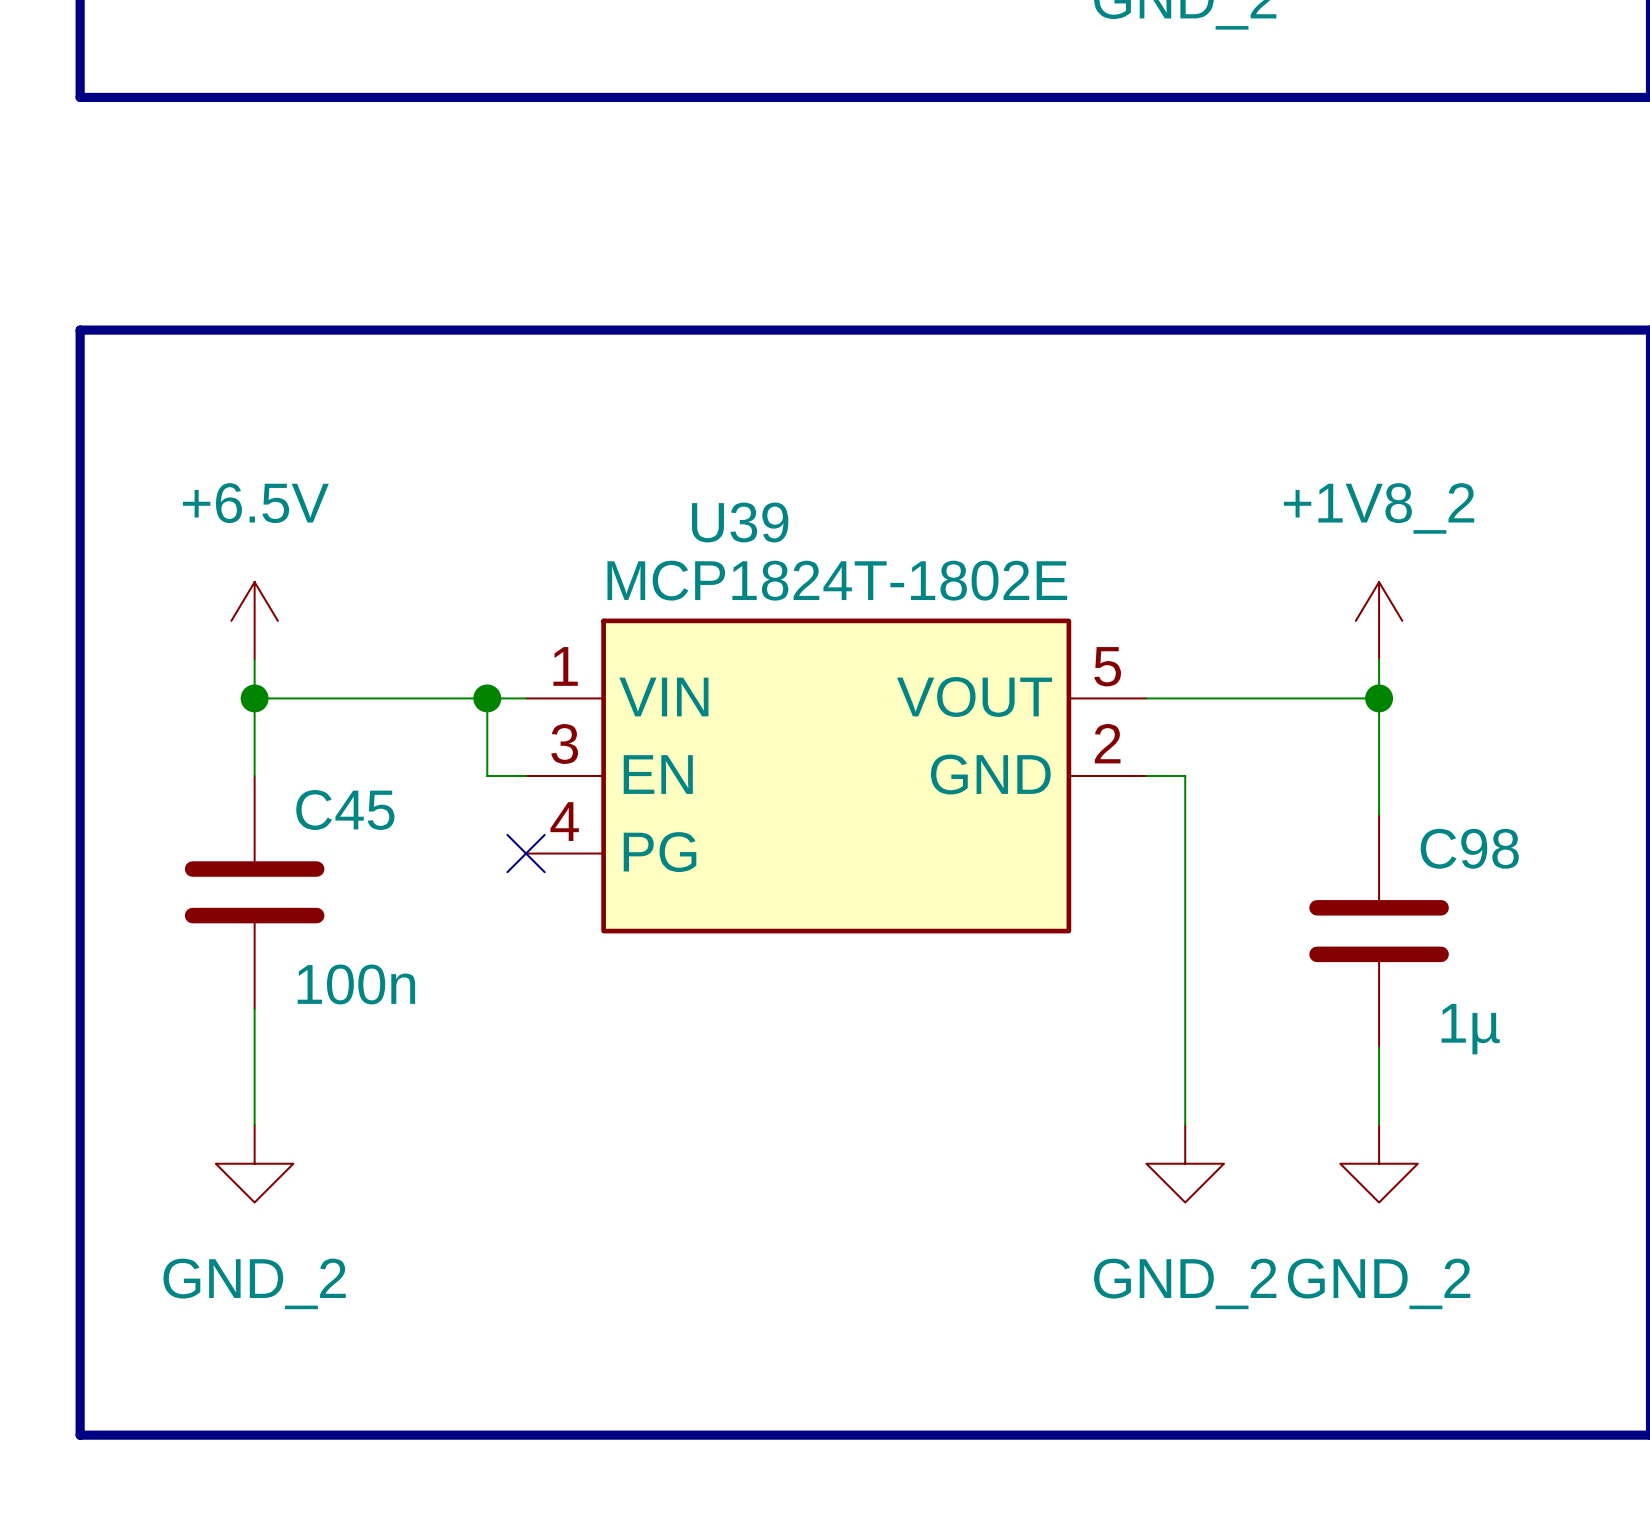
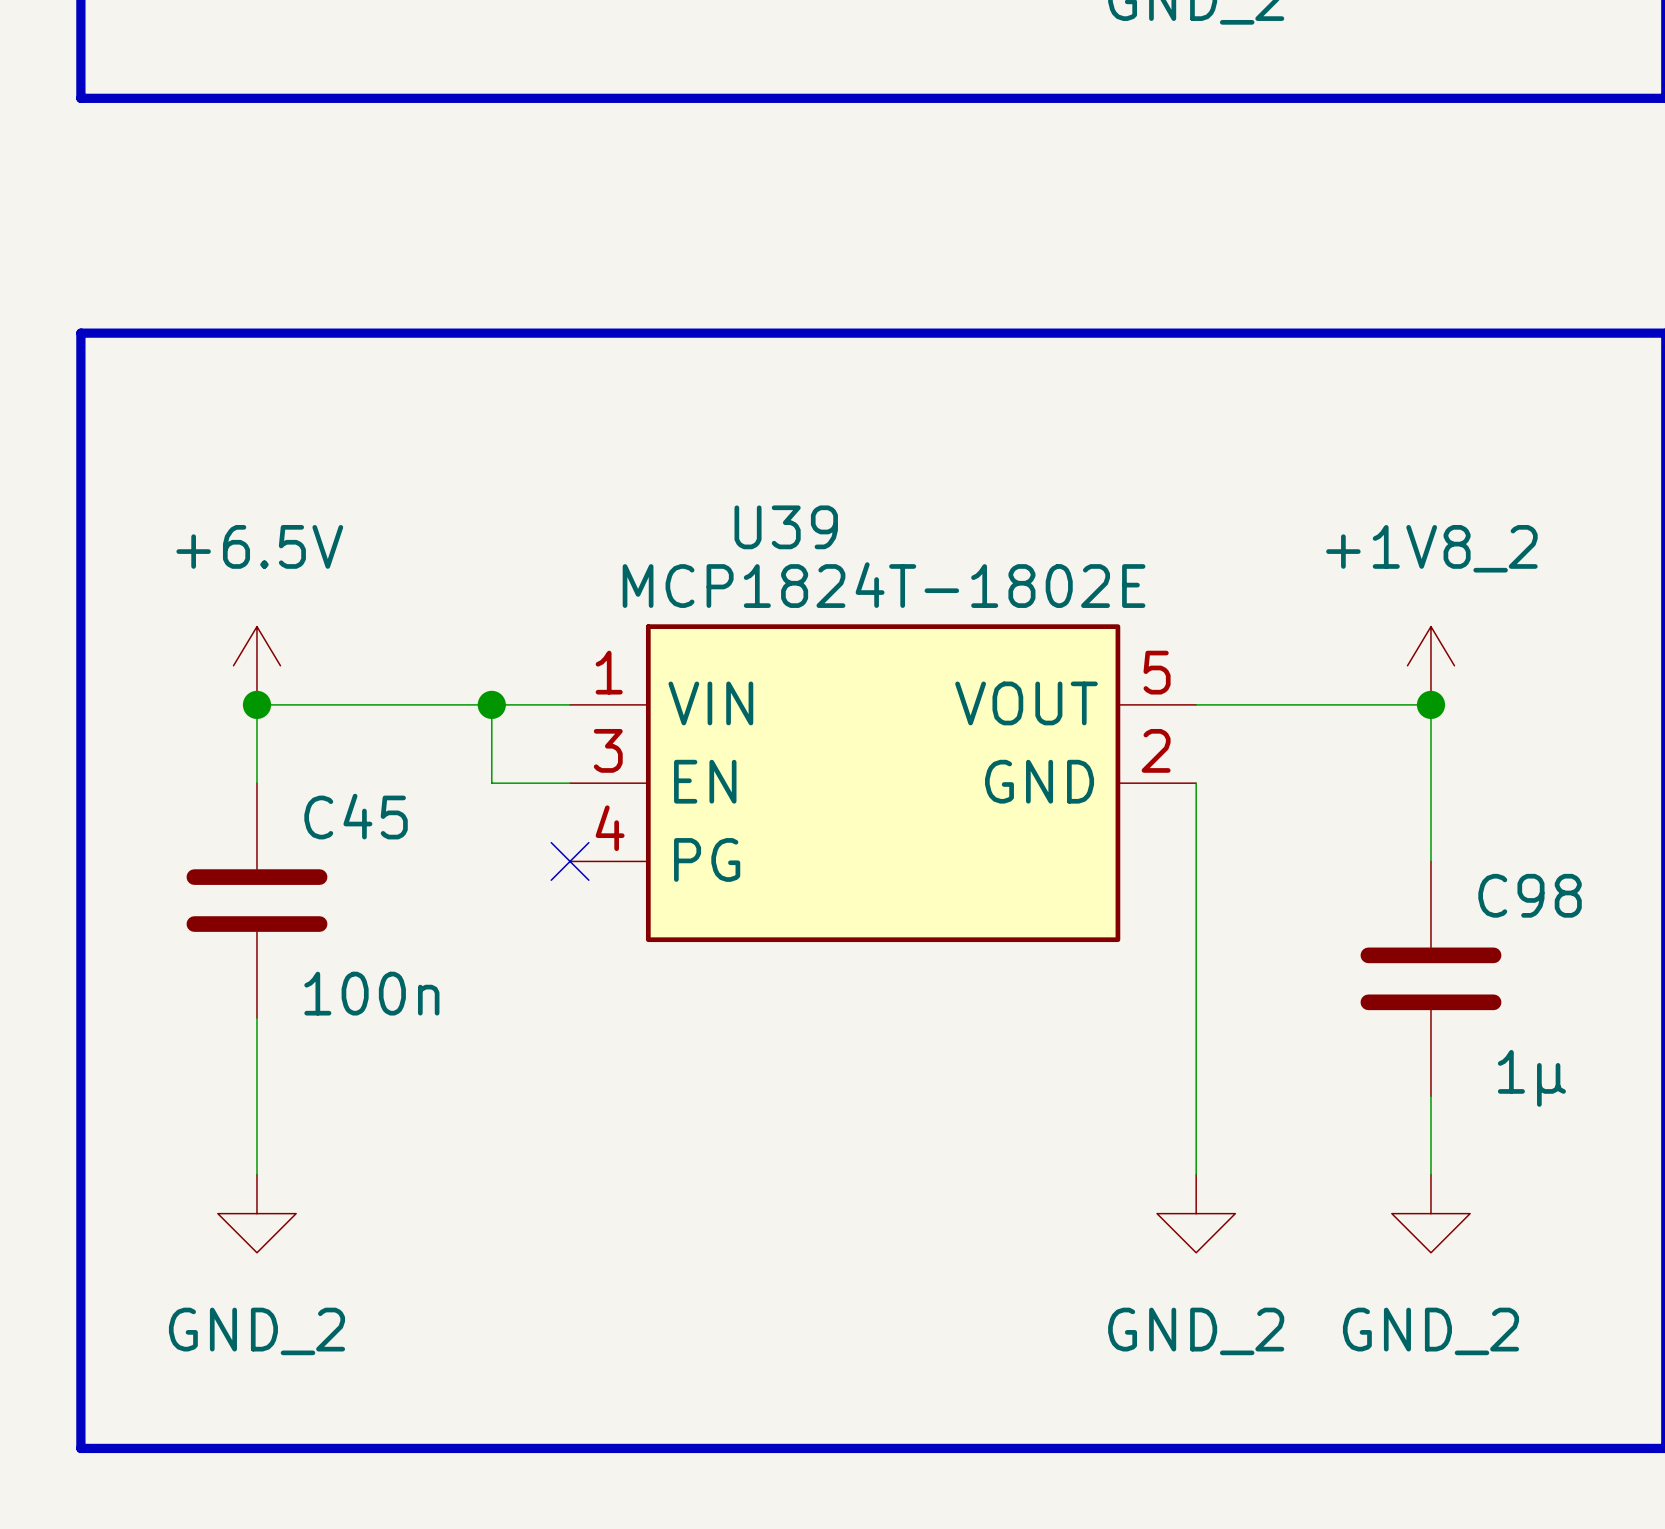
power symbol position: +6.5V (254, 620) -> +6.5V (256, 665)
power symbol position: +1V8_2 (1379, 620) -> +1V8_2 (1430, 665)
wire: (1379, 659) (1379, 814) -> none
wire: none -> (1391, 704) (1430, 704) (1430, 861)
junction position: (1379, 698) -> (1430, 704)
U39 position: (836, 775) -> (883, 783)
no-connect mark position: (526, 853) -> (570, 861)
C98 position: (1379, 931) -> (1430, 978)
wire: (1379, 1047) (1379, 1124) -> (1430, 1096) (1430, 1174)
power symbol position: GND_2 (254, 1163) -> GND_2 (256, 1213)
power symbol position: GND_2 (1185, 1163) -> GND_2 (1196, 1213)
power symbol position: GND_2 (1379, 1163) -> GND_2 (1430, 1213)

